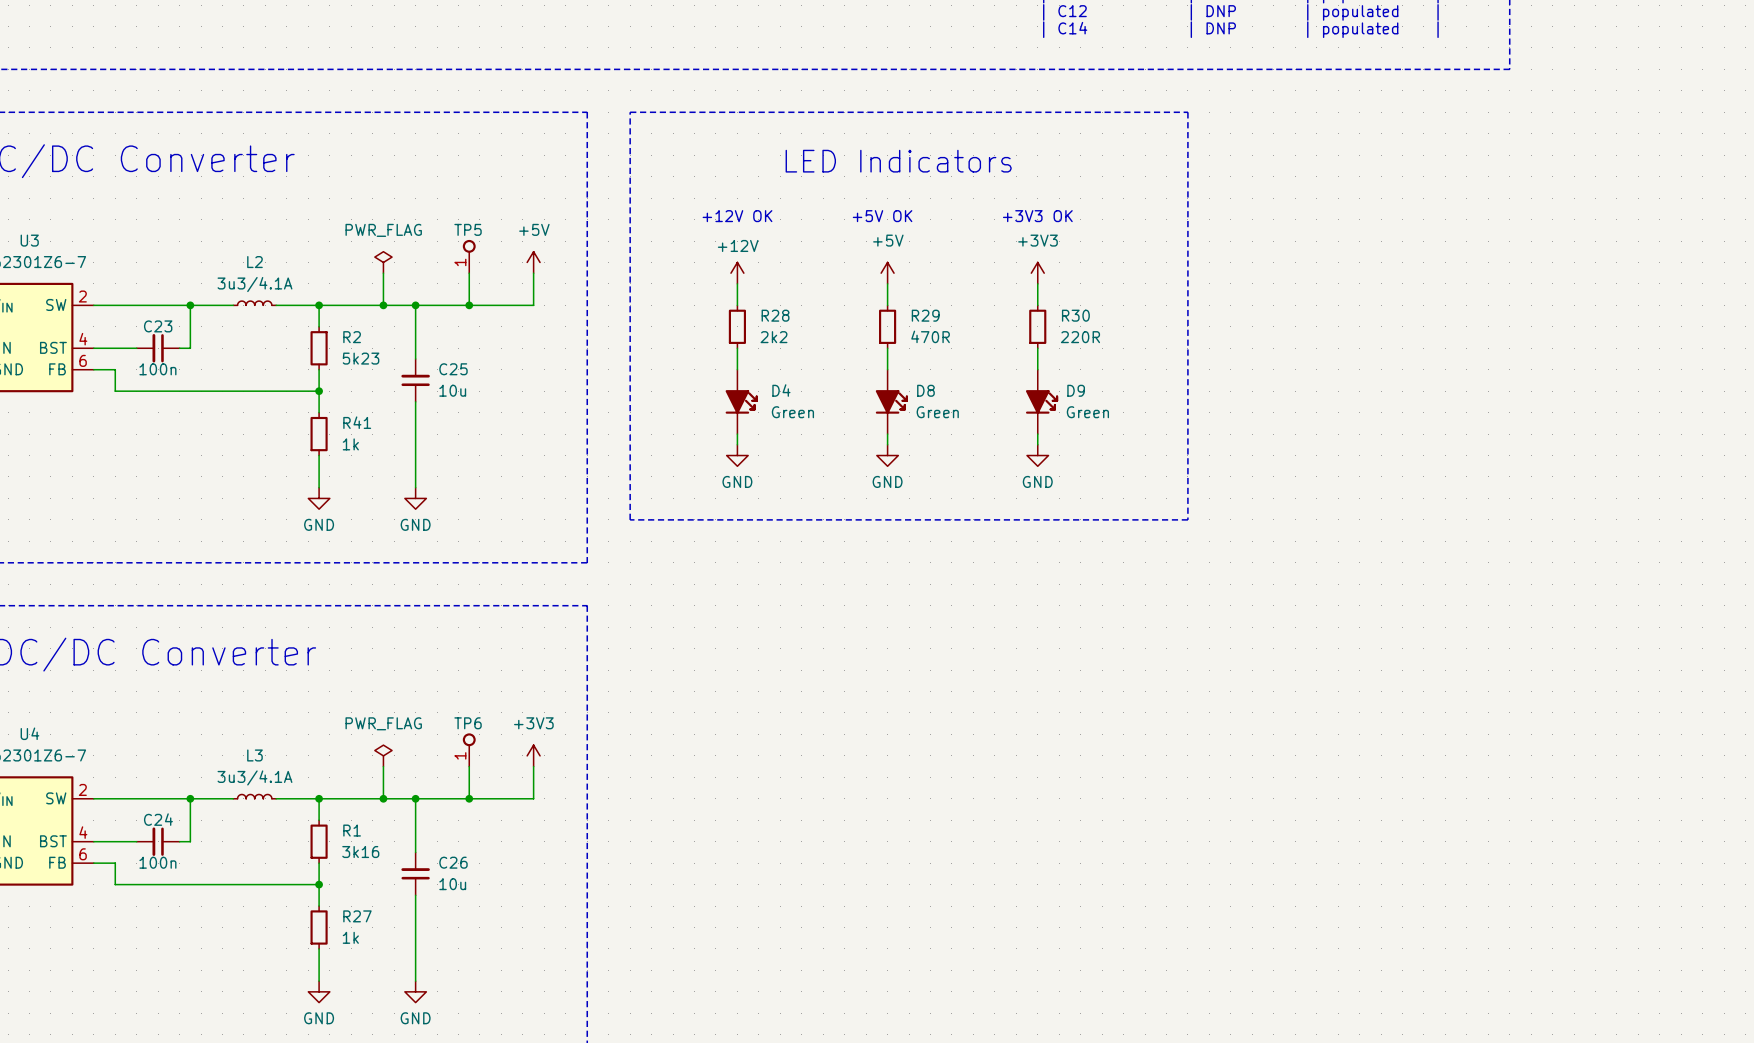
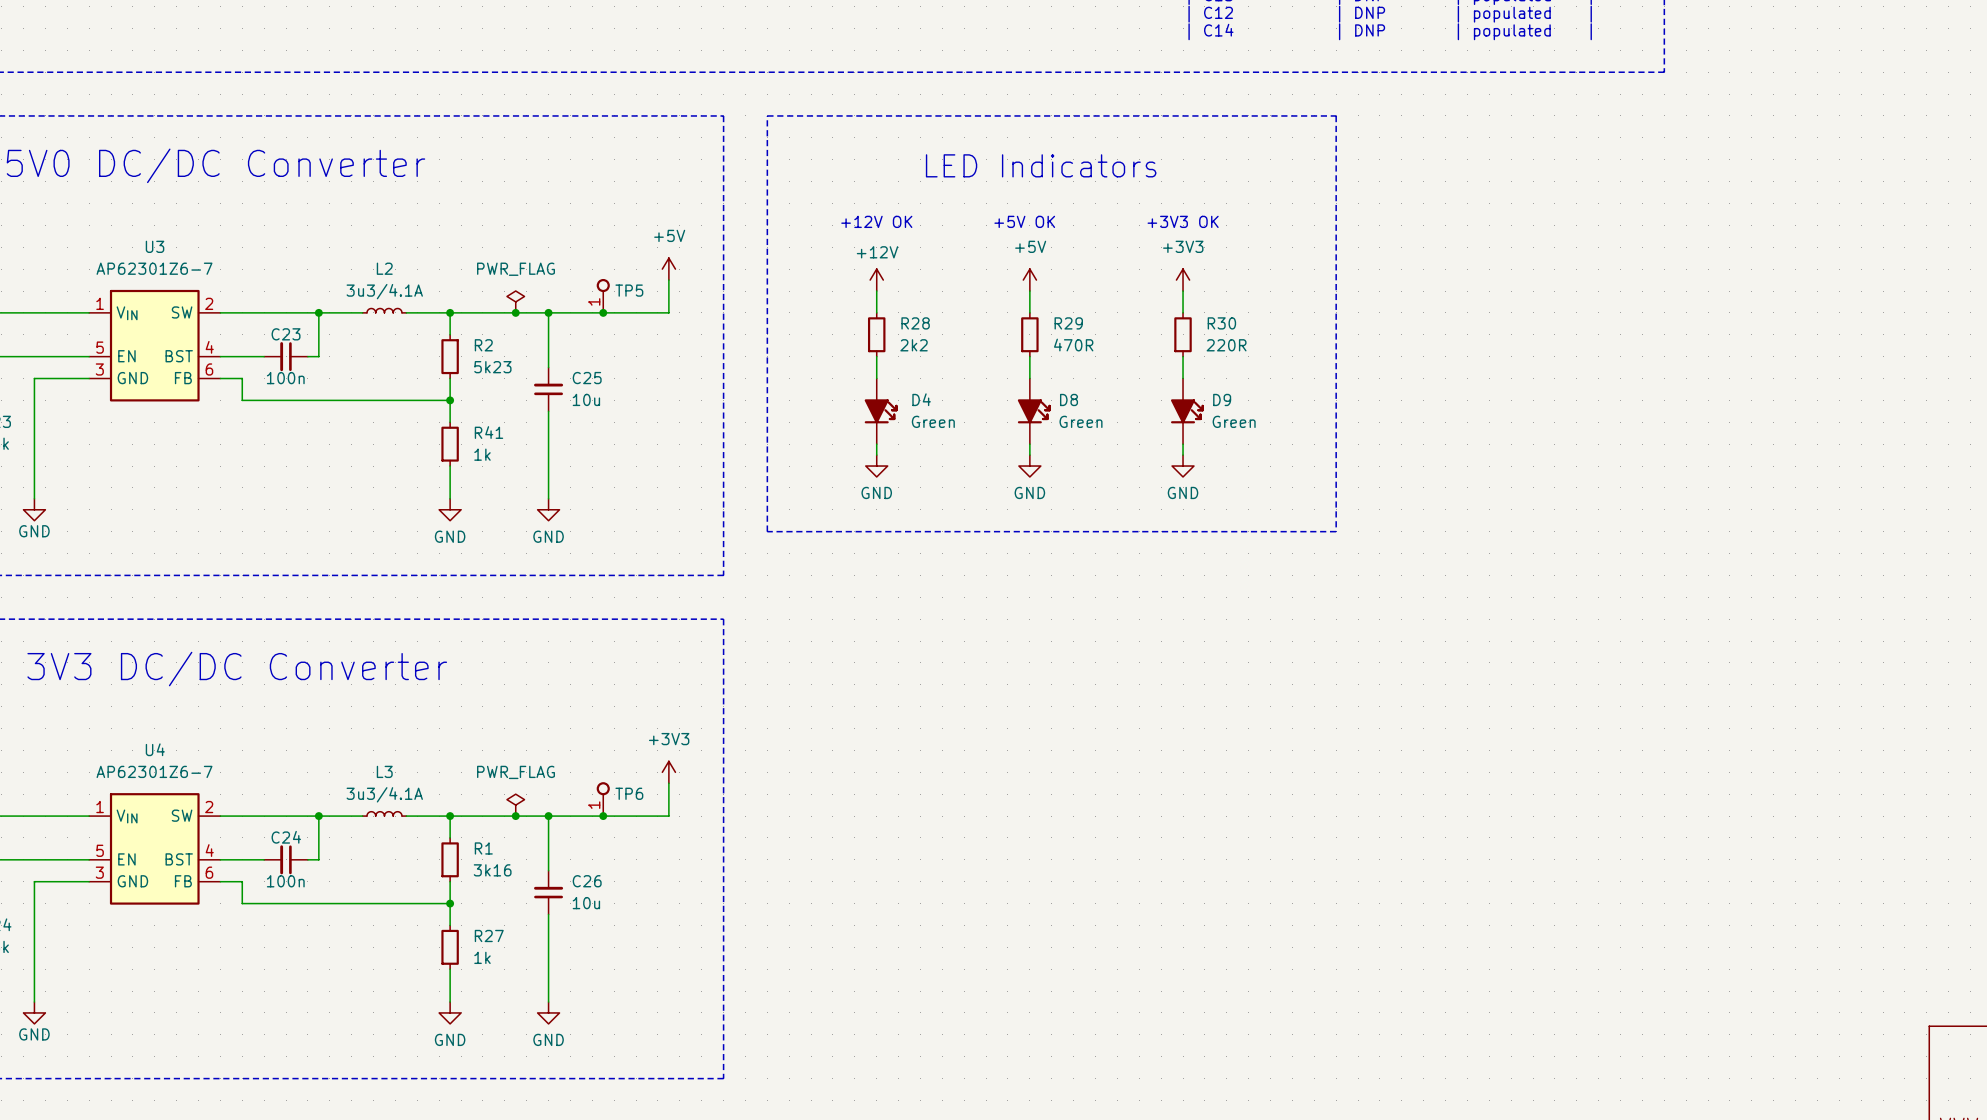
TP5 name position: TP5 (468, 229) -> TP5 (629, 290)
TP5 position: (469, 256) -> (603, 295)
power symbol position: PWR_FLAG (383, 262) -> PWR_FLAG (515, 301)
wire: (383, 273) (383, 305) -> none
TP6 name position: TP6 (468, 723) -> TP6 (629, 793)
TP6 position: (469, 749) -> (603, 799)
power symbol position: PWR_FLAG (383, 755) -> PWR_FLAG (515, 805)
wire: (383, 766) (383, 798) -> none

